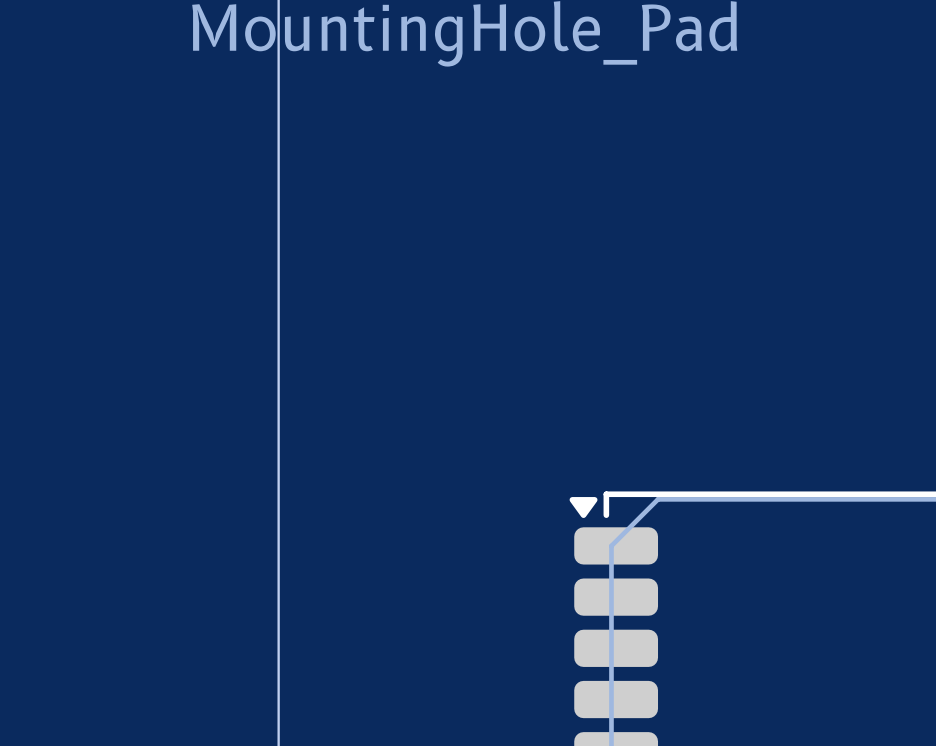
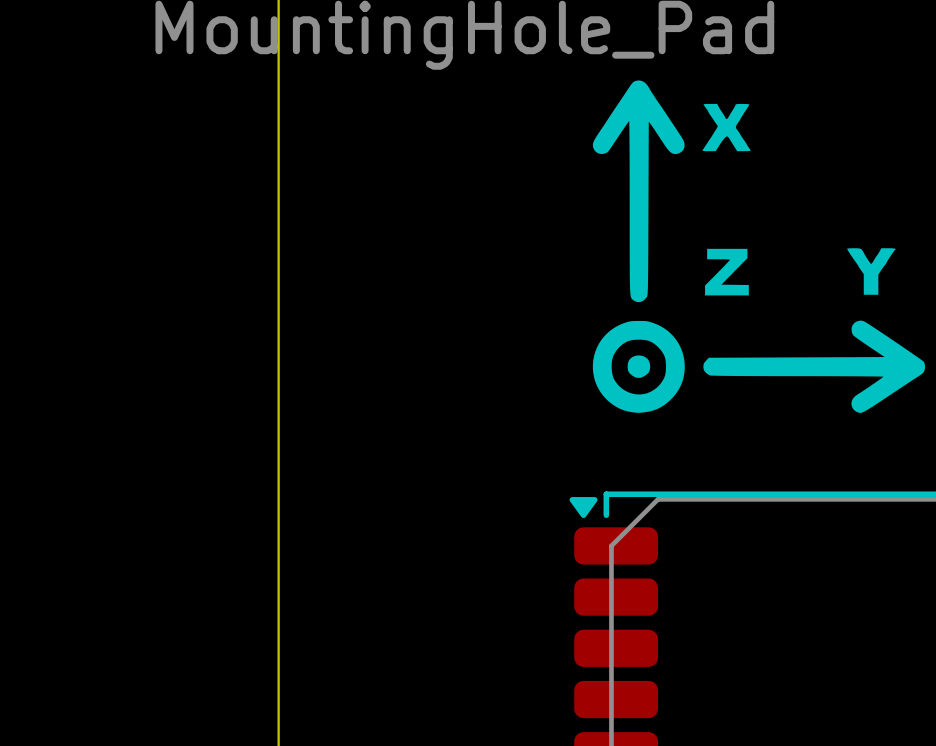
drawing: none -> [592, 80, 926, 413]

